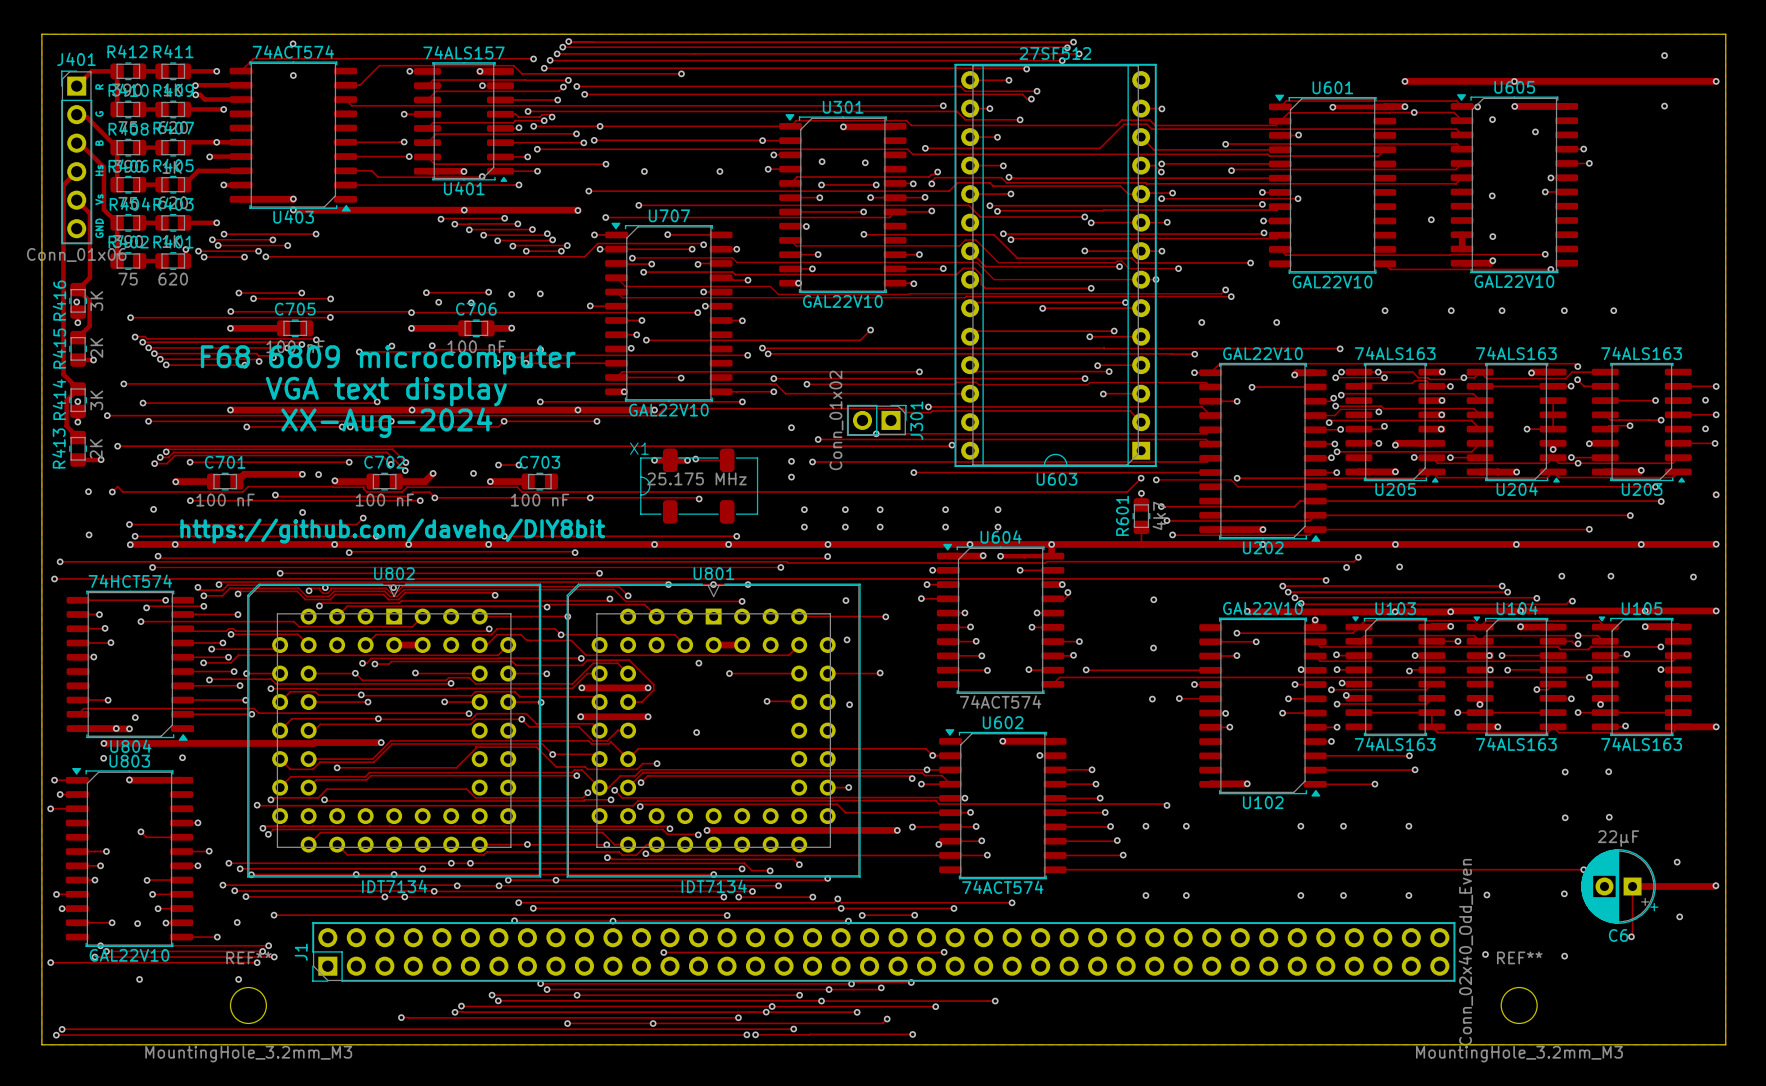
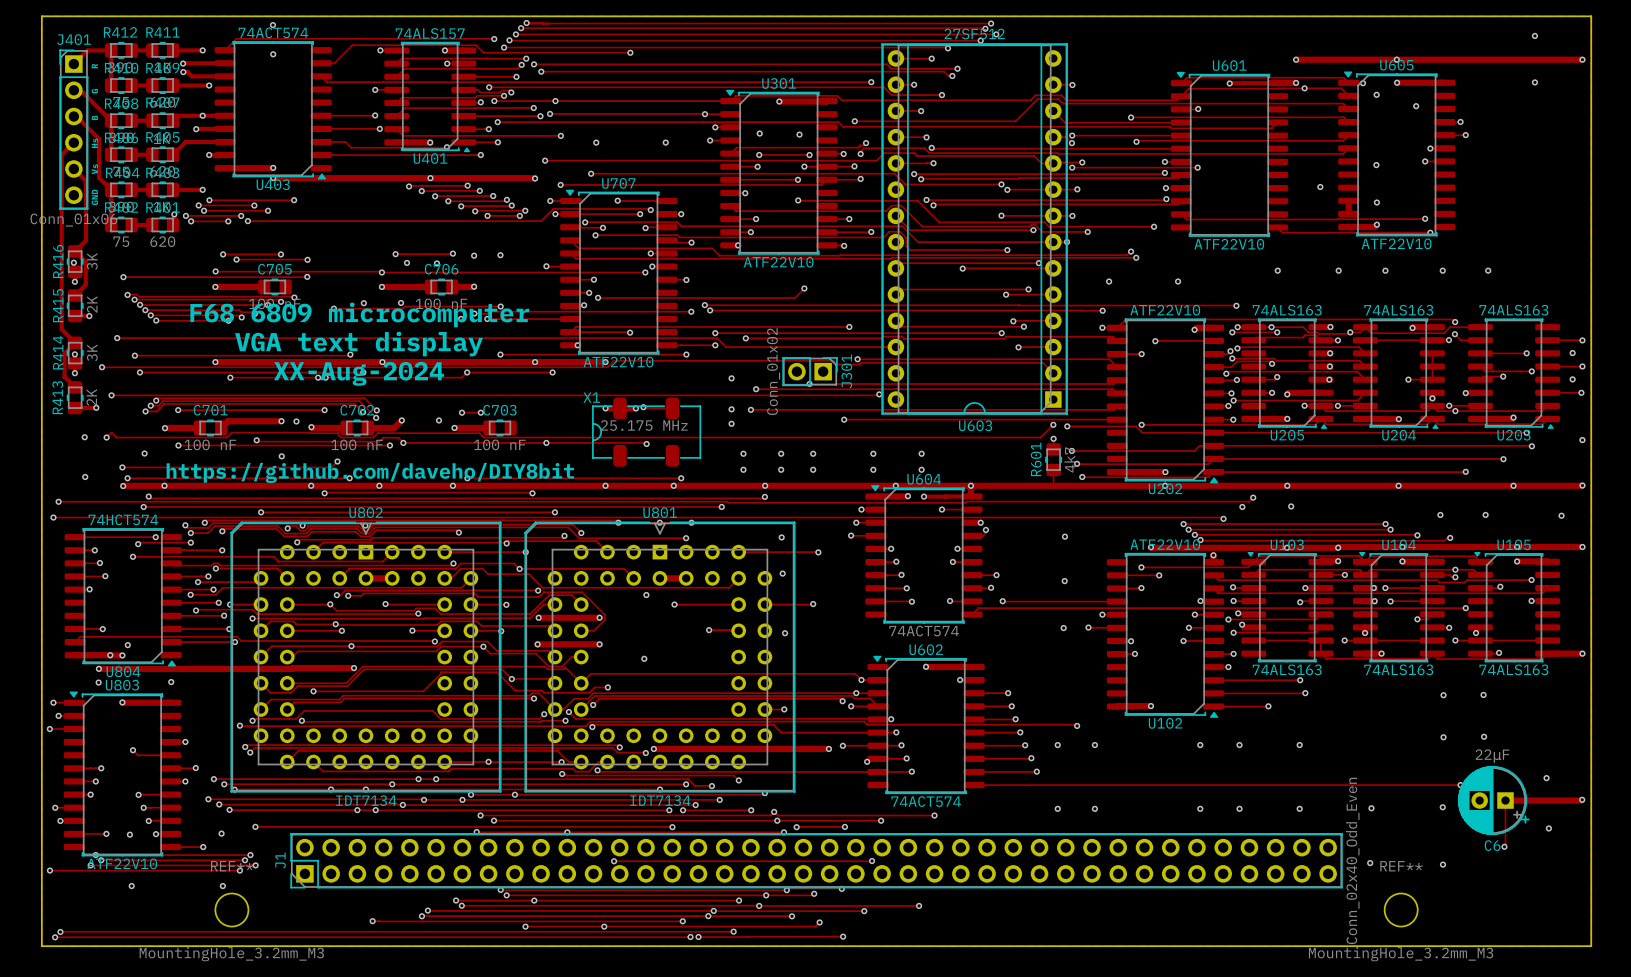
U601 value: GAL22V10 (1332, 281) -> ATF22V10 (1229, 244)
U605 value: GAL22V10 (1514, 281) -> ATF22V10 (1396, 243)
U301 value: GAL22V10 (842, 301) -> ATF22V10 (778, 262)
U202 value: GAL22V10 (1262, 353) -> ATF22V10 (1165, 310)
U707 value: GAL22V10 (668, 410) -> ATF22V10 (618, 362)
U102 value: GAL22V10 (1262, 608) -> ATF22V10 (1165, 544)
U803 value: GAL22V10 (129, 955) -> ATF22V10 (122, 863)

